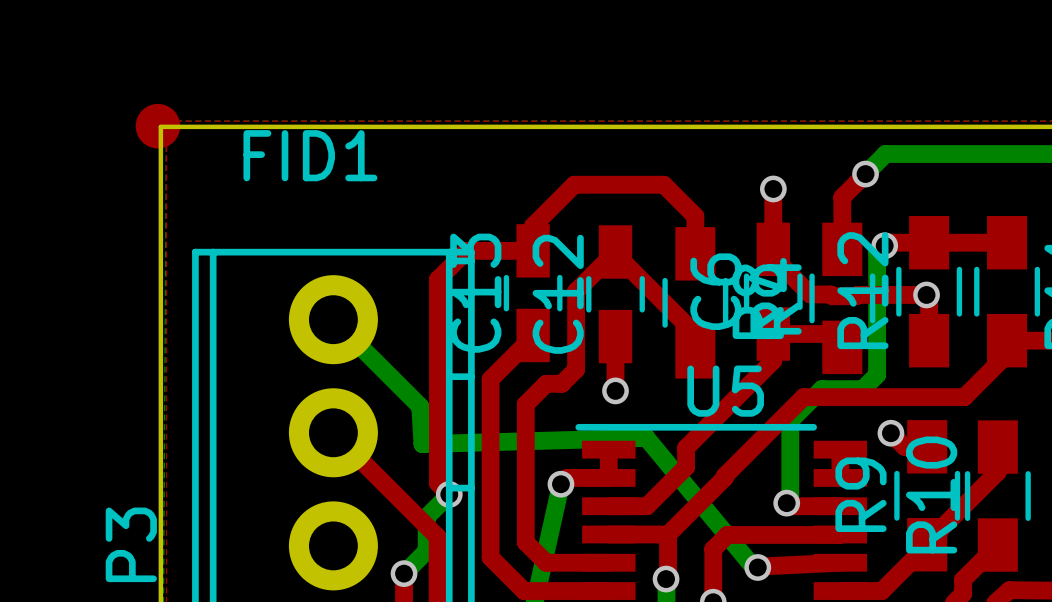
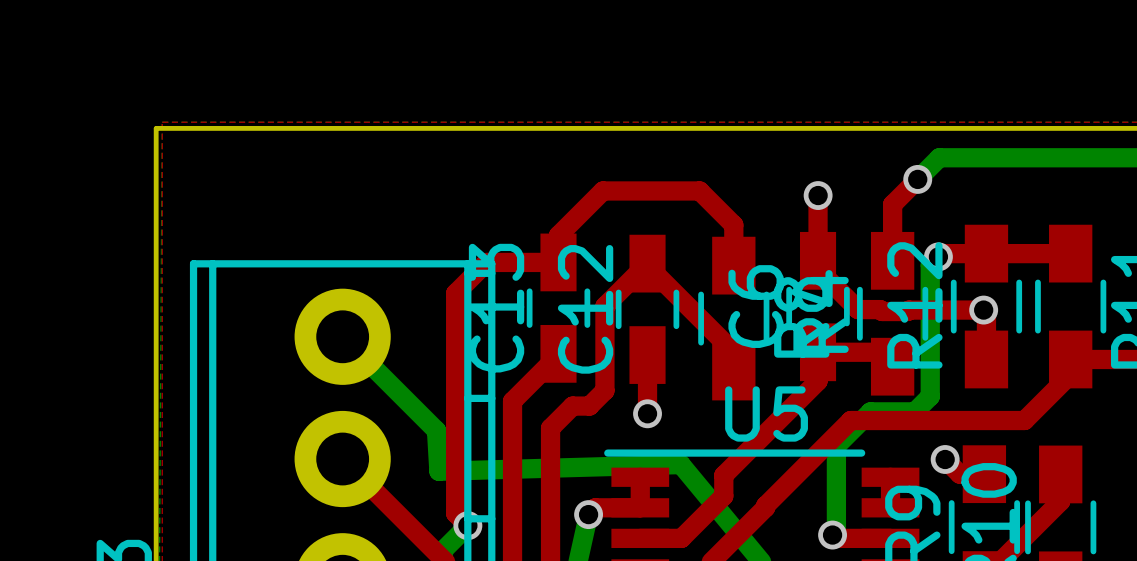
FID1: (157, 126) -> none

